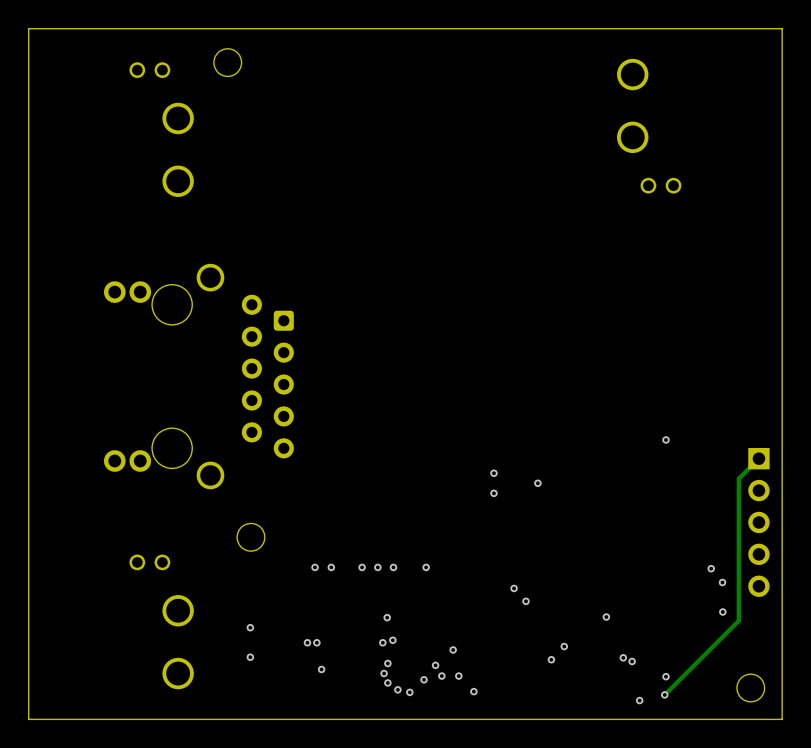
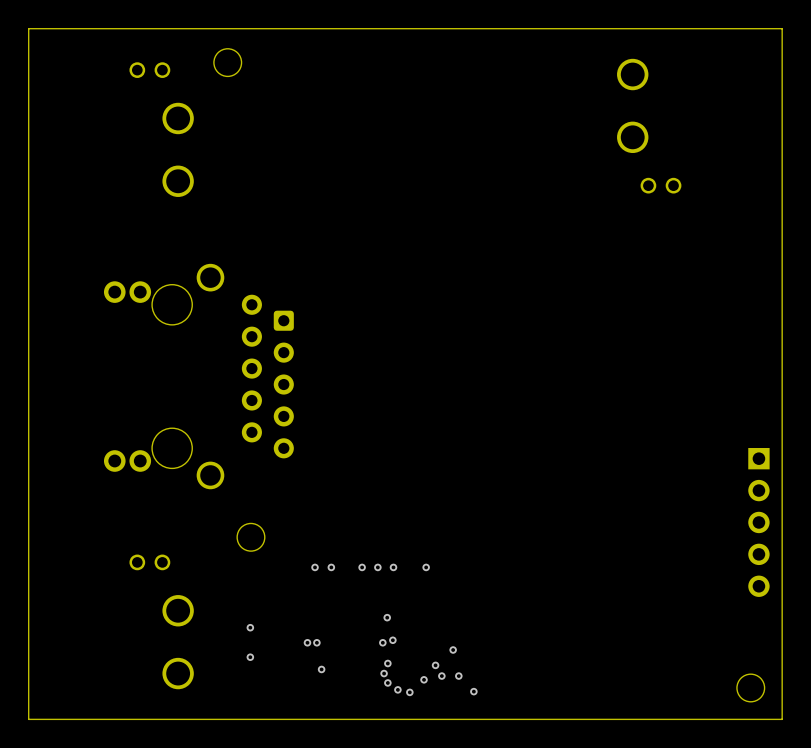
via: (666, 439) -> none
track: (758, 458) (738, 478) (738, 620) (664, 694) -> none
via: (493, 473) -> none
via: (537, 483) -> none
via: (493, 493) -> none
via: (711, 568) -> none
via: (722, 582) -> none
via: (514, 588) -> none
via: (525, 601) -> none
via: (722, 612) -> none
via: (606, 617) -> none
via: (564, 646) -> none
via: (623, 657) -> none
via: (551, 659) -> none
via: (632, 661) -> none
via: (666, 676) -> none
via: (664, 694) -> none
via: (639, 700) -> none

